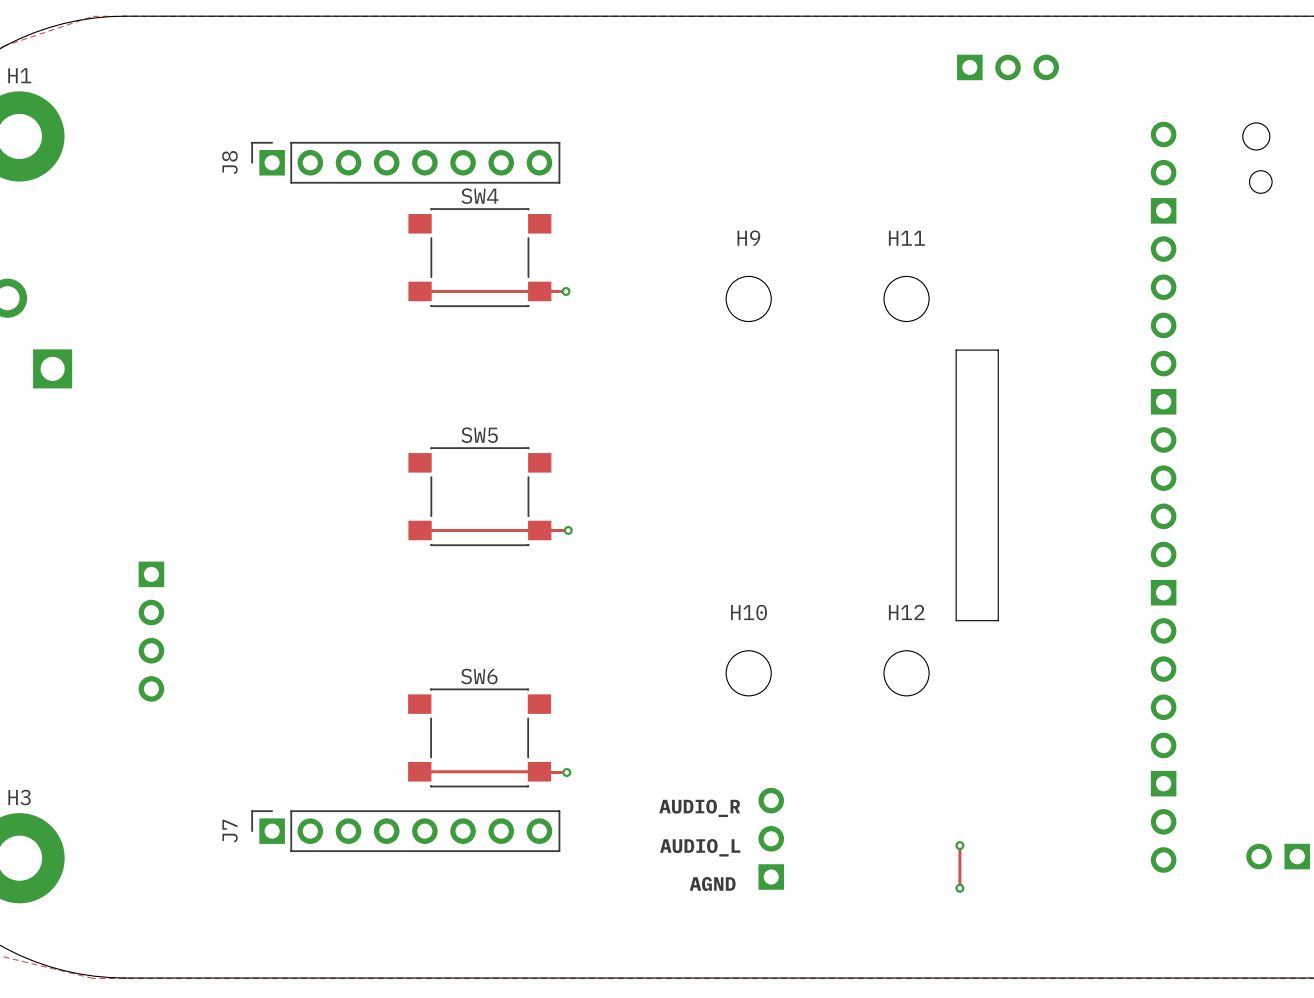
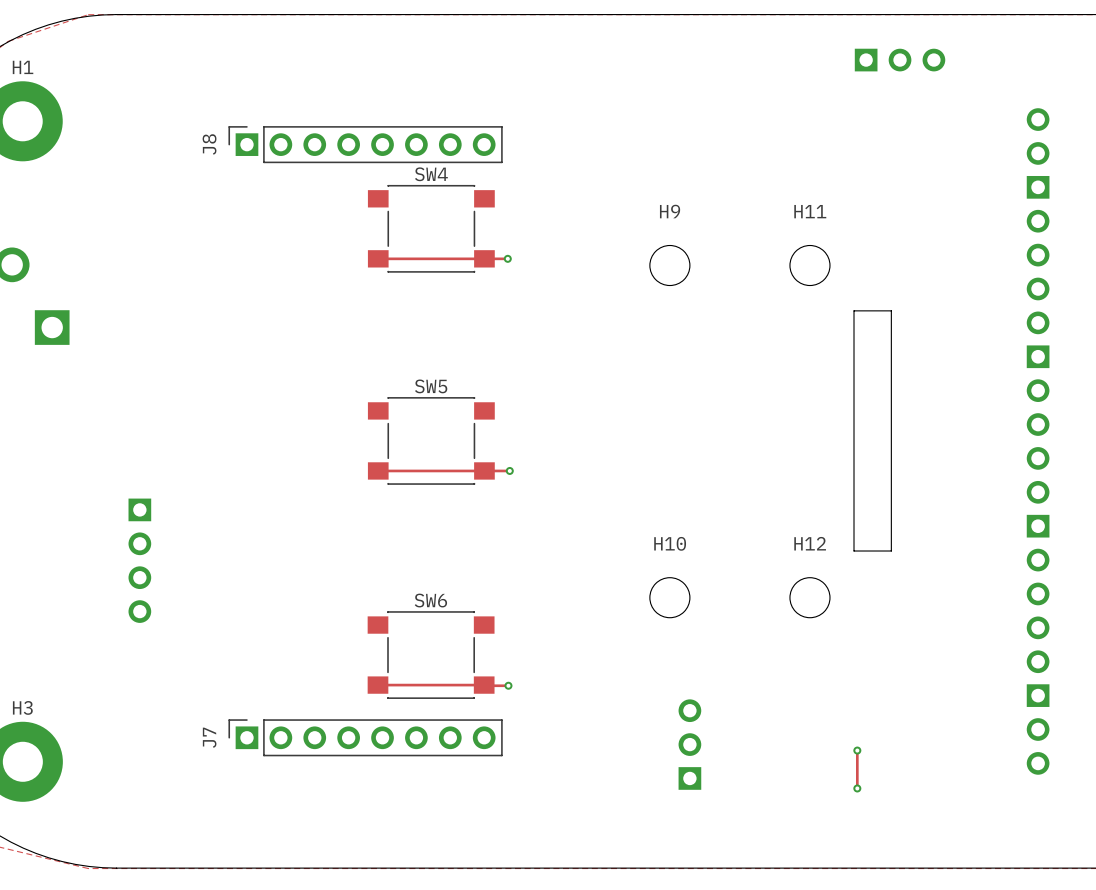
text: AUDIO_R (699, 808) -> none
text: AUDIO_L (700, 847) -> none
text: AGND (712, 883) -> none

